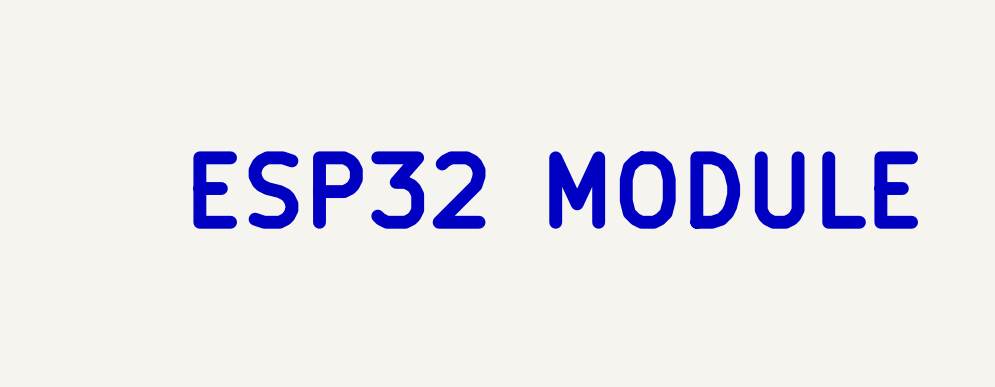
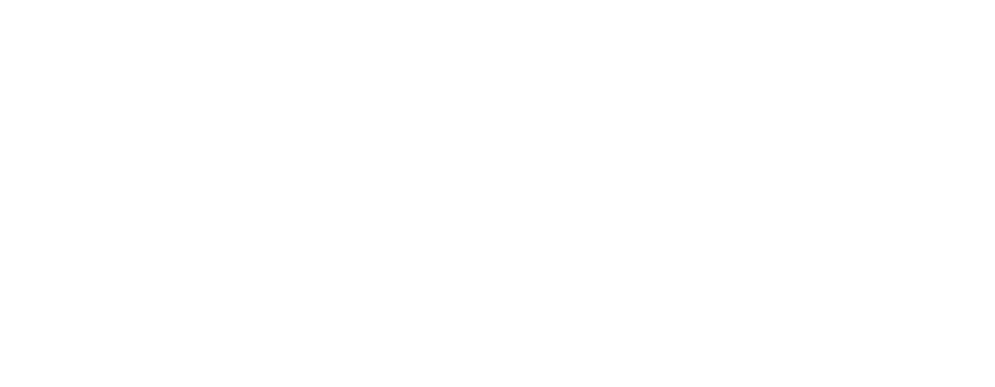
text: ESP32 MODULE (555, 190) -> none

